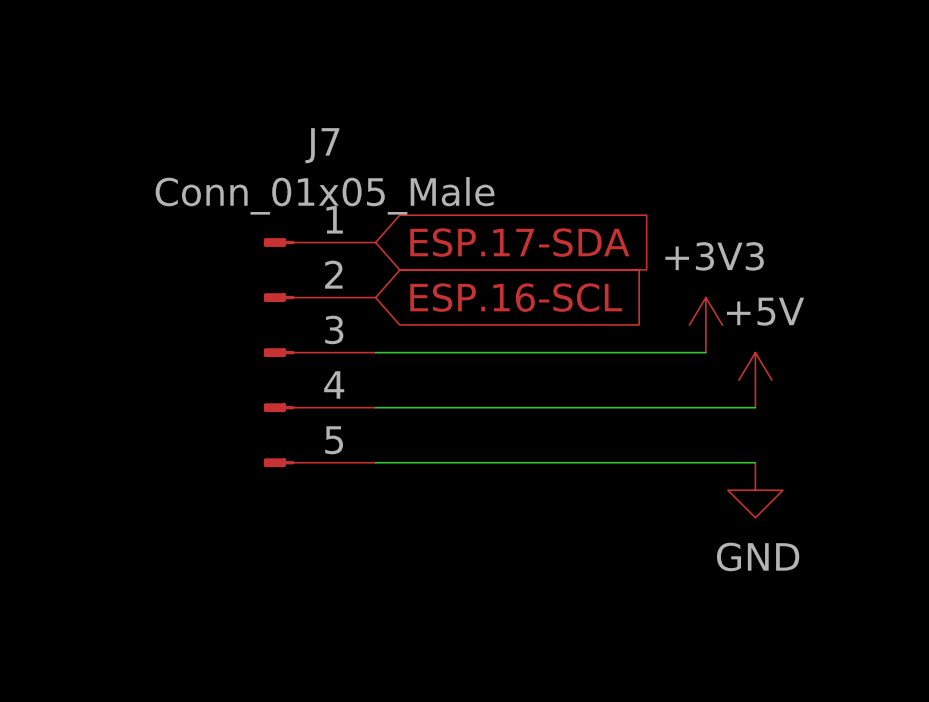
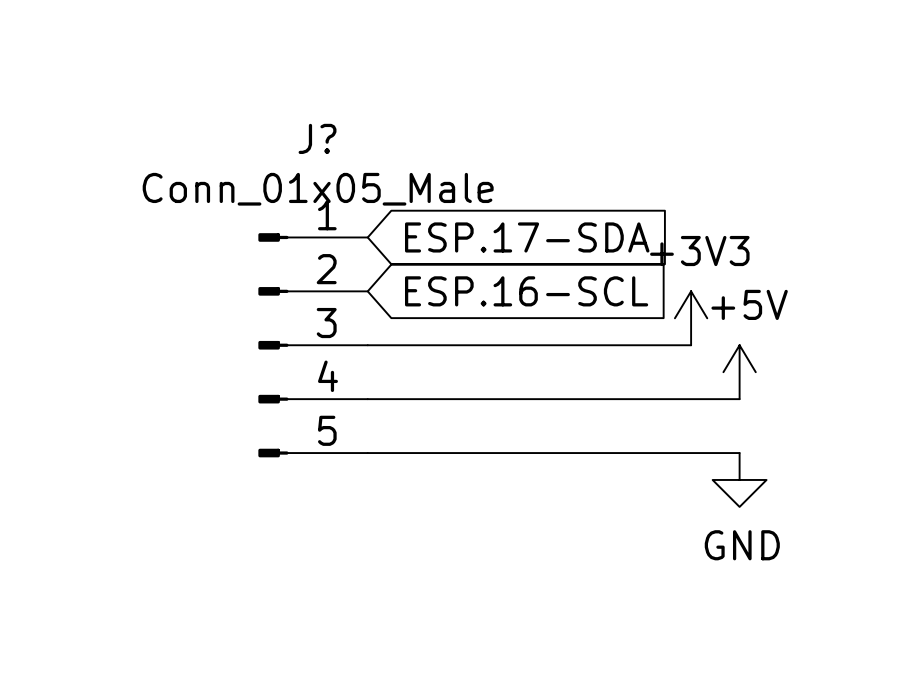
J7 name: J7 (322, 145) -> J? (317, 138)

